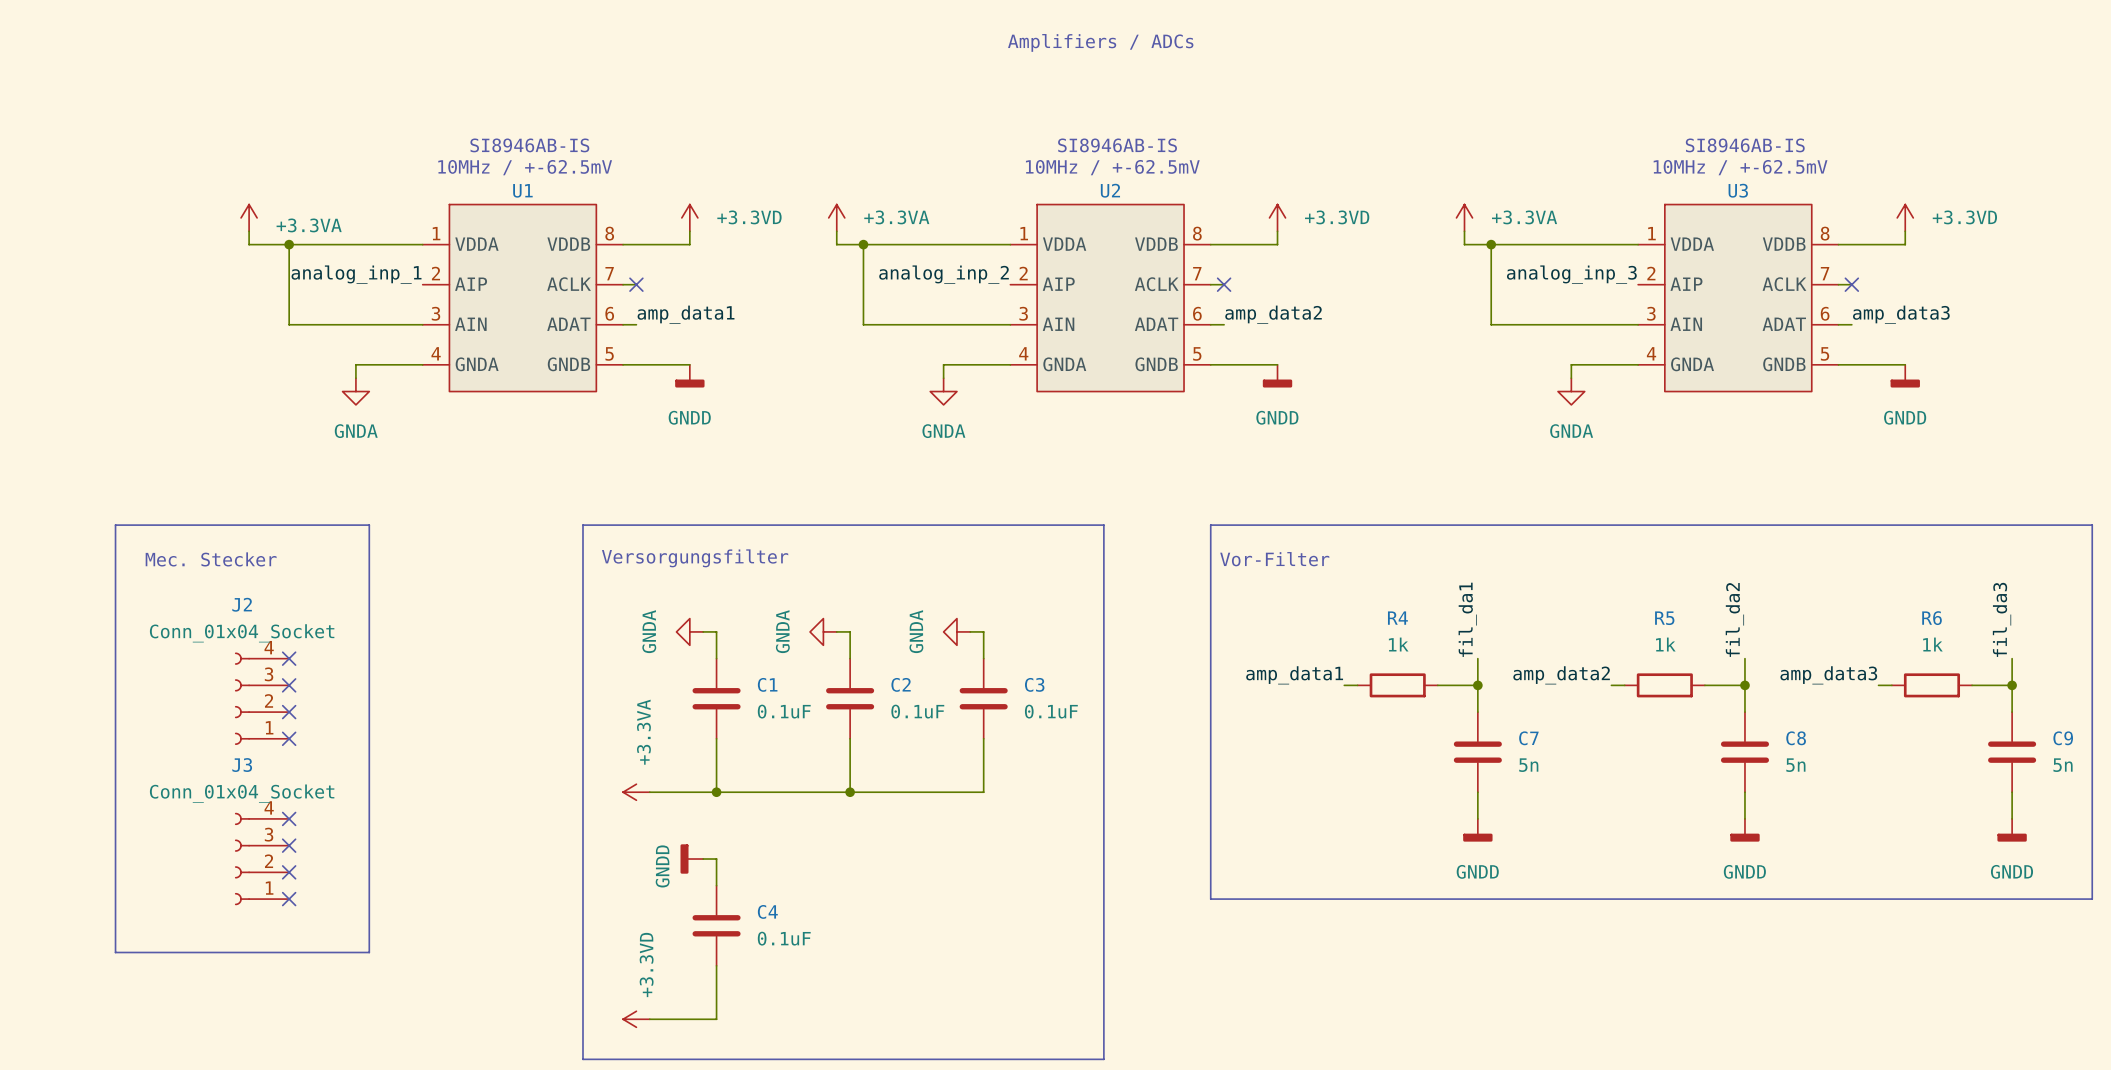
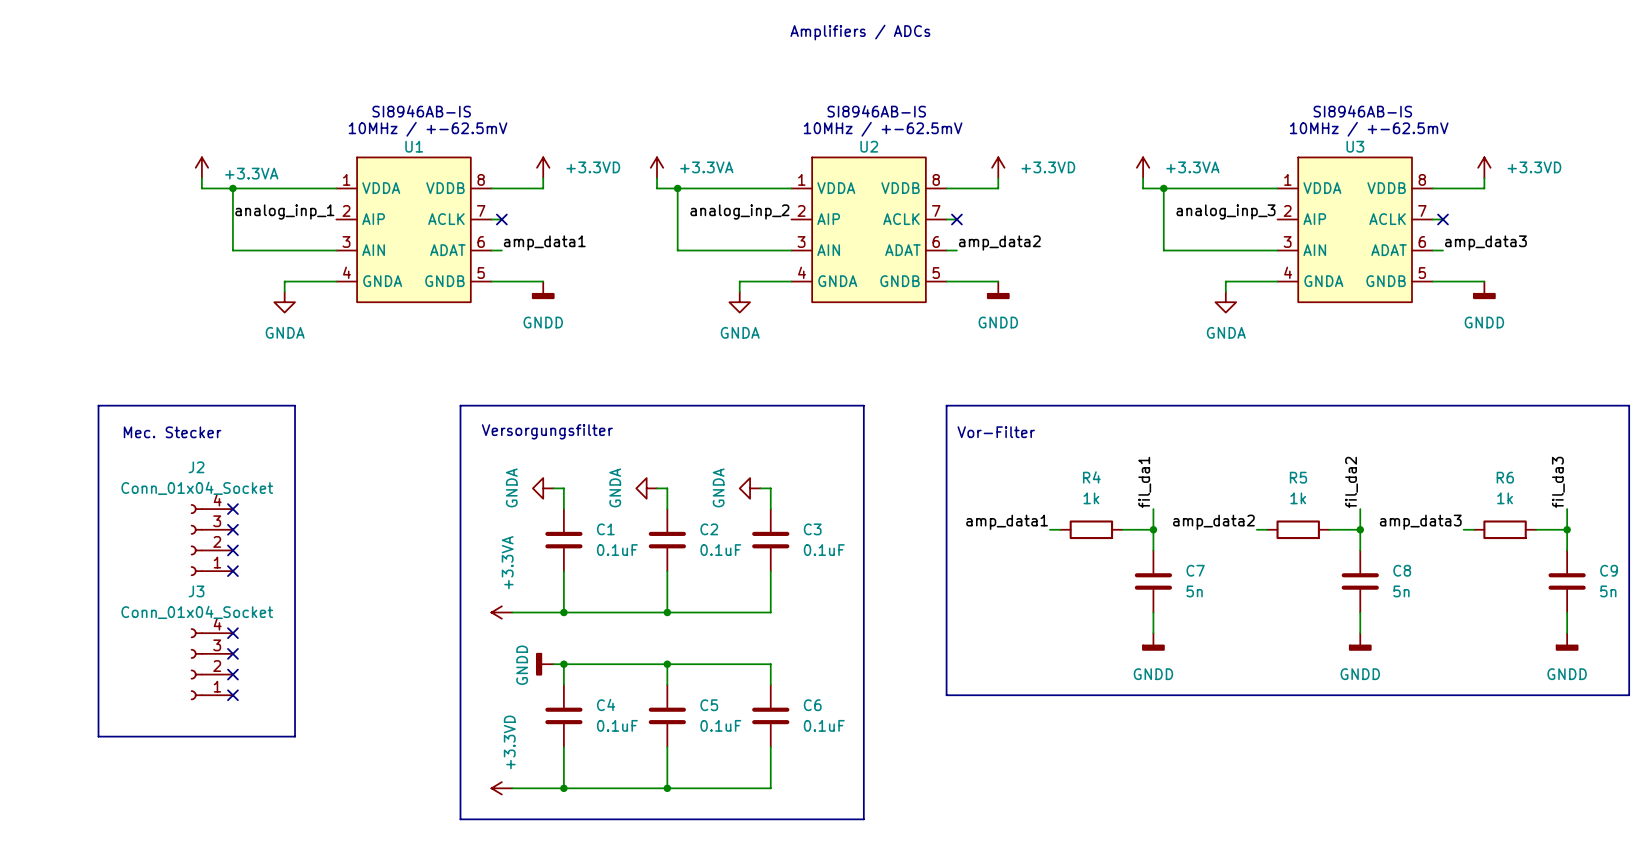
wire: none -> (563, 664) (770, 664) (770, 684)
junction: none -> (563, 664)
wire: none -> (667, 664) (667, 684)
junction: none -> (667, 664)
C5: none -> 0.1uF (667, 715)
C6: none -> 0.1uF (770, 715)
wire: none -> (667, 746) (667, 788)
wire: none -> (770, 746) (770, 788) (563, 788)
junction: none -> (563, 788)
junction: none -> (667, 788)

